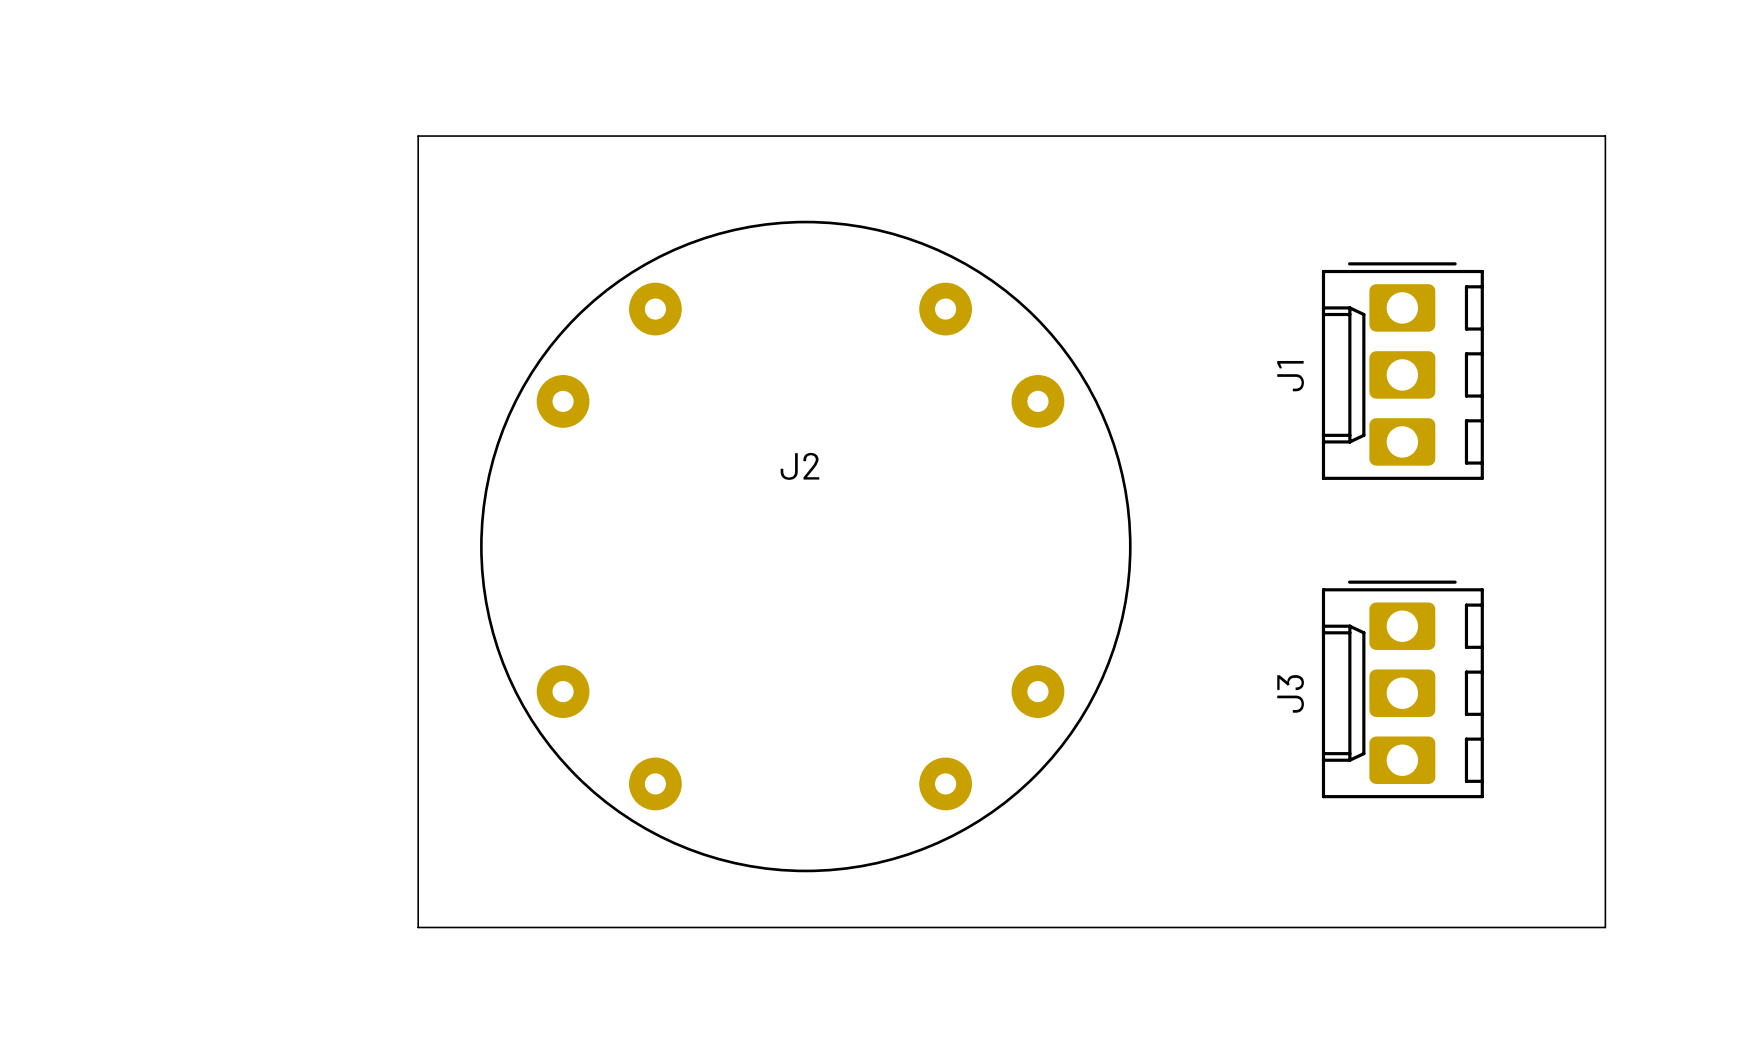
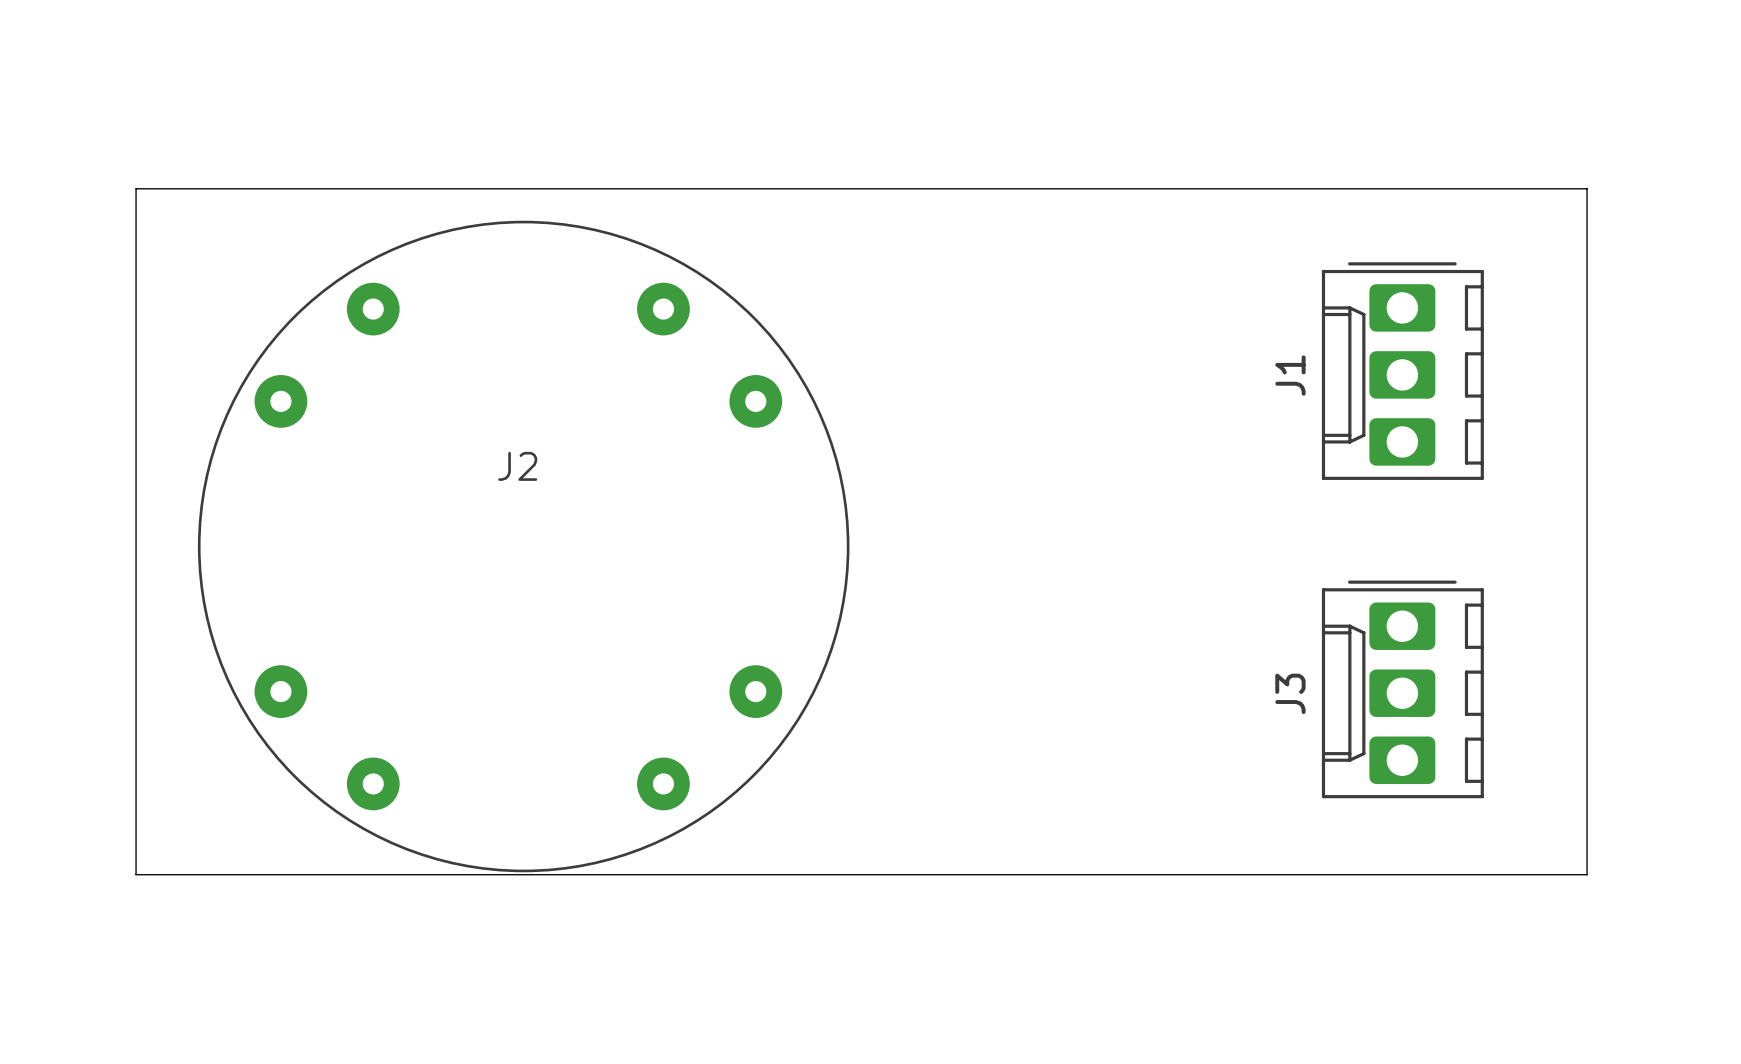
board edge: (418, 136) (1605, 136) (1605, 927) (418, 927) (418, 136) -> (136, 188) (136, 874) (1587, 874) (1587, 188) (136, 188)
J2 position: (805, 546) -> (523, 546)

